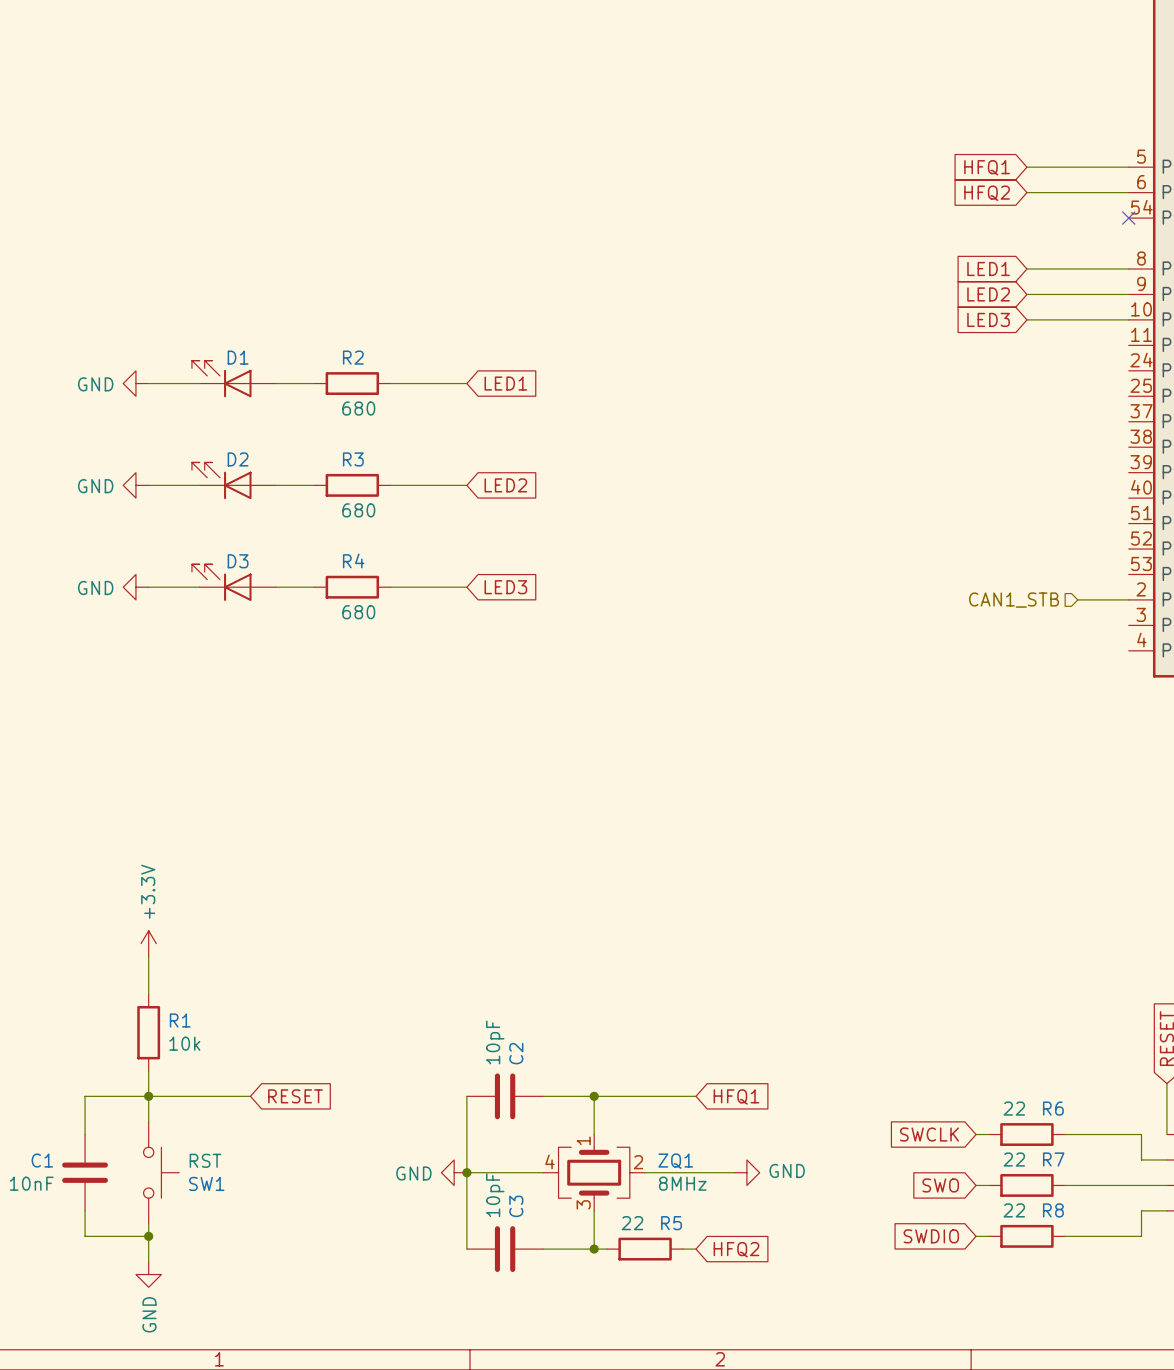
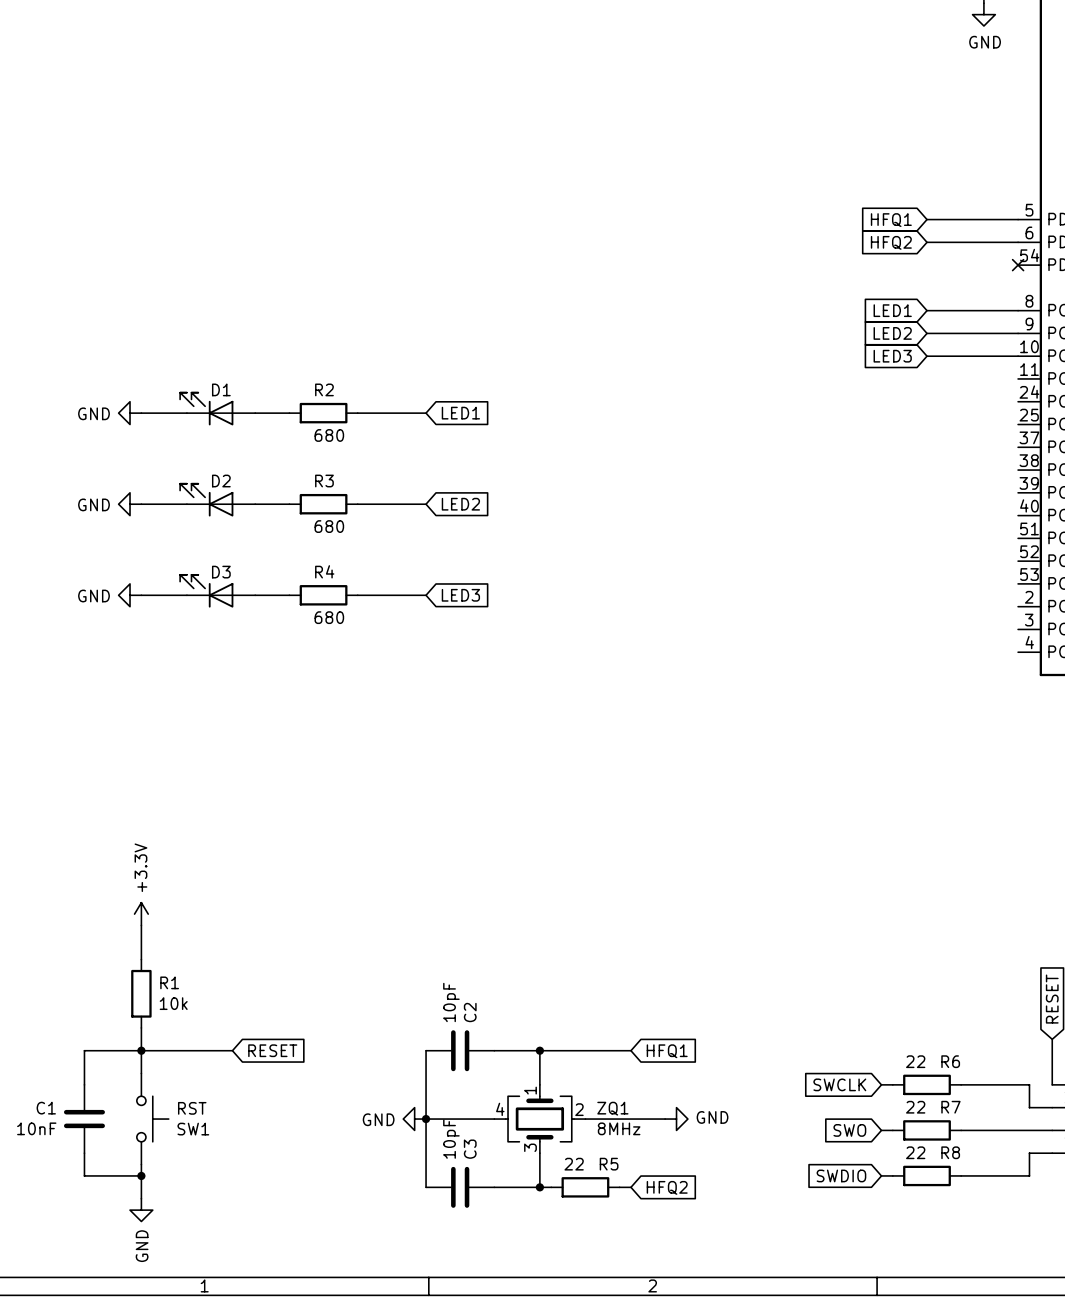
wire: (1077, 599) (1128, 599) -> none
hierarchical label: CAN1_STB (1014, 600) -> none

